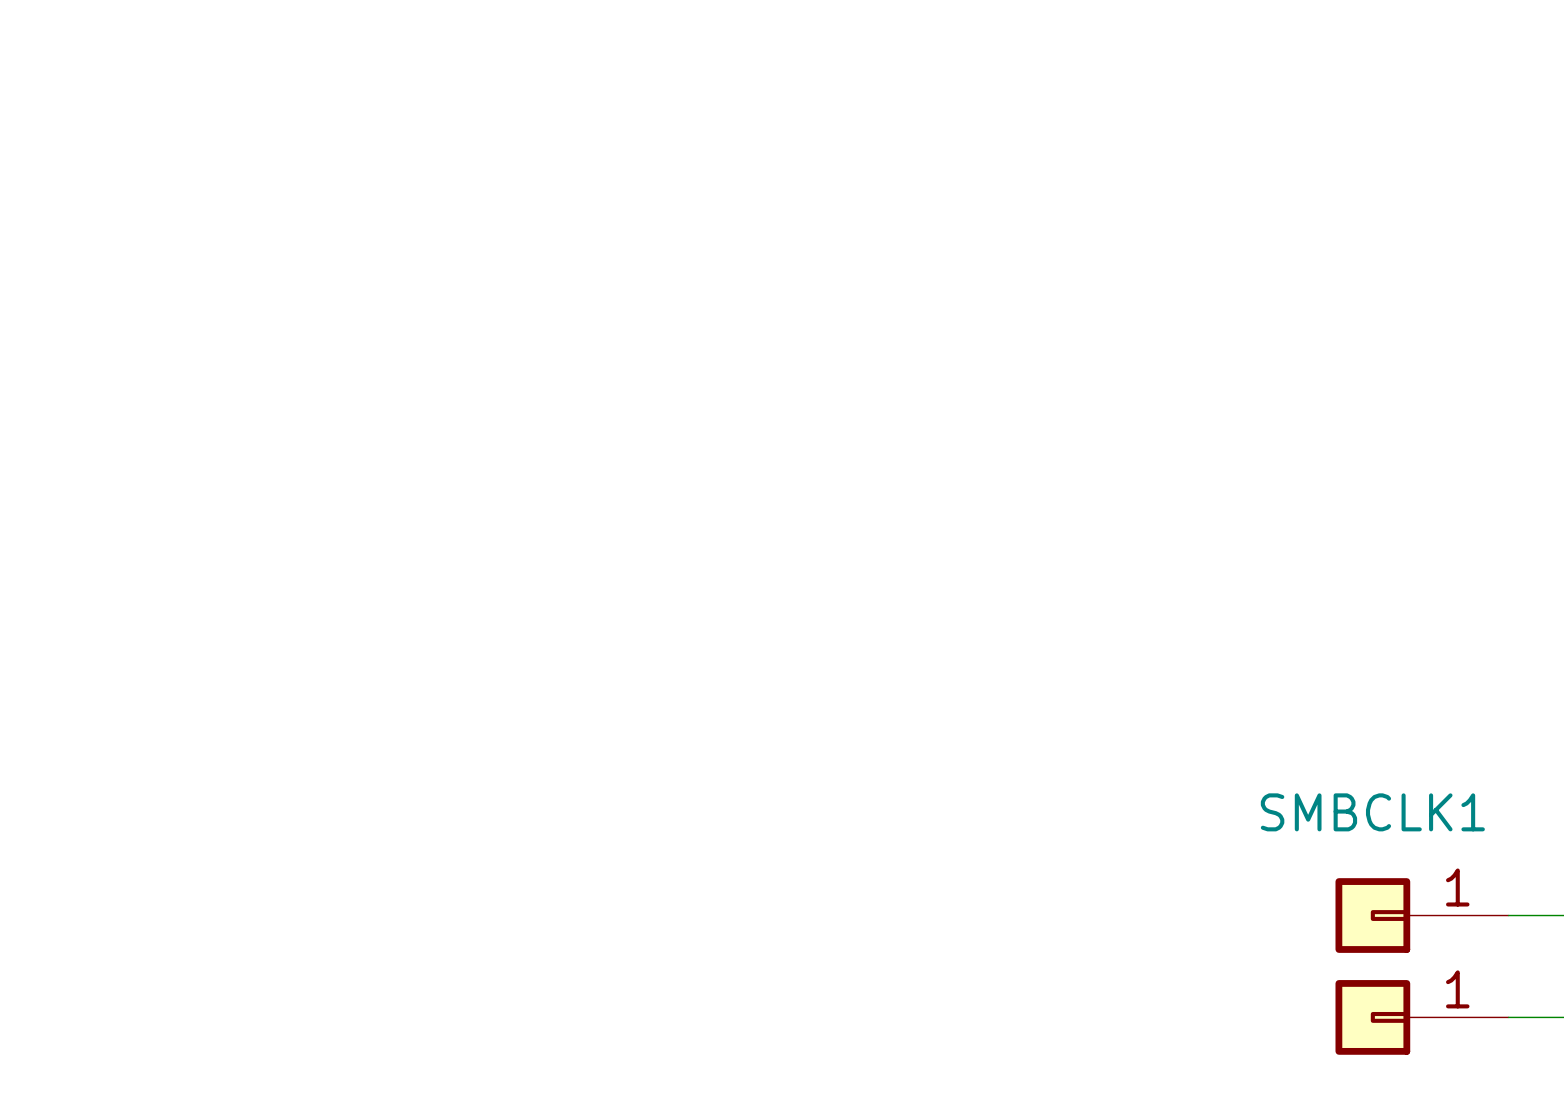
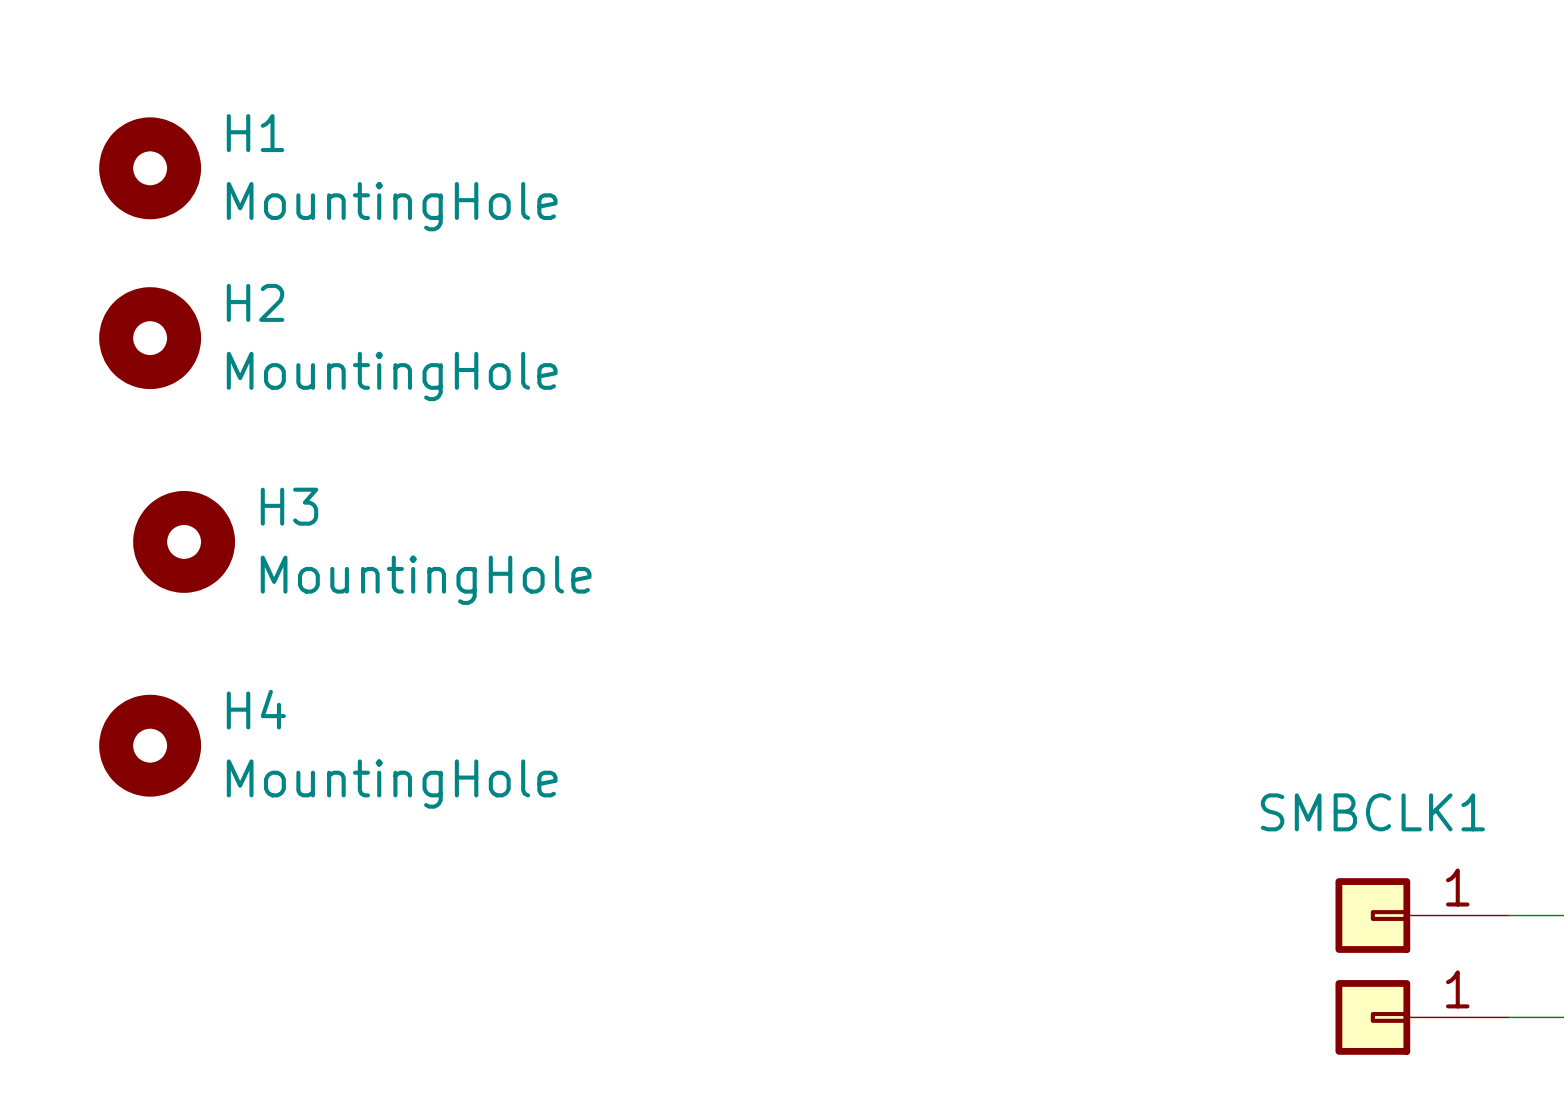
H1: none -> MountingHole (150, 168)
H2: none -> MountingHole (150, 338)
H3: none -> MountingHole (184, 541)
H4: none -> MountingHole (150, 745)

